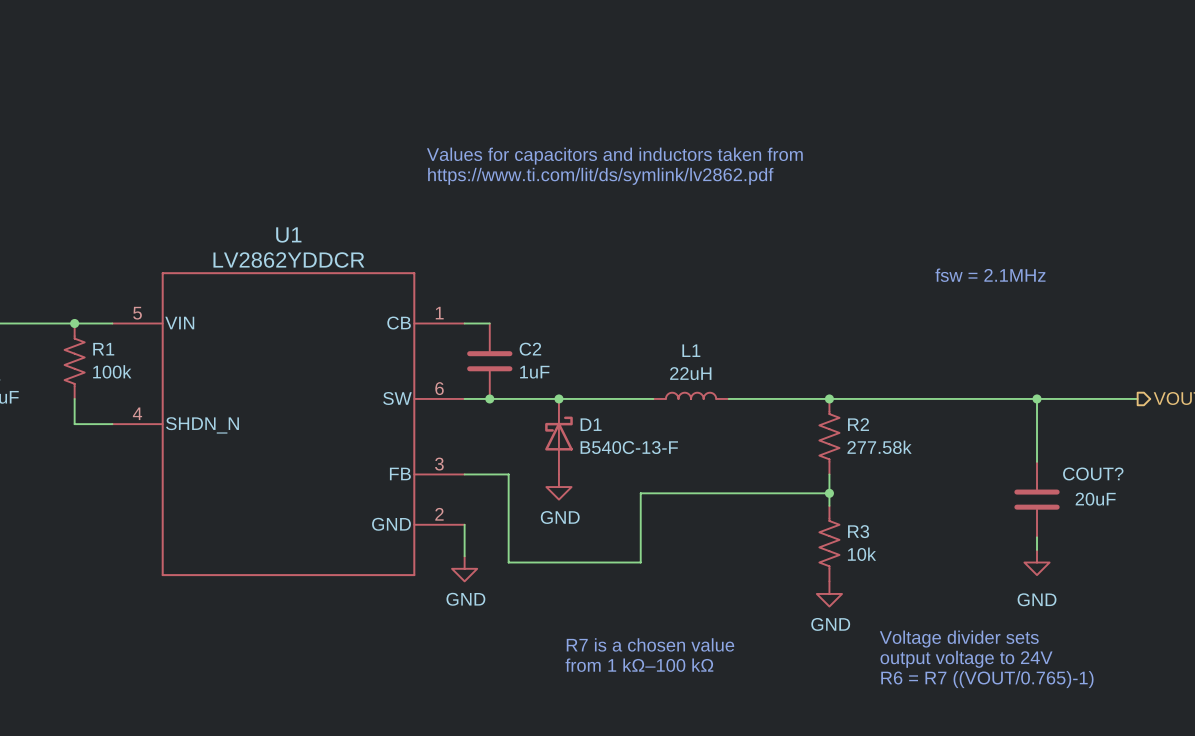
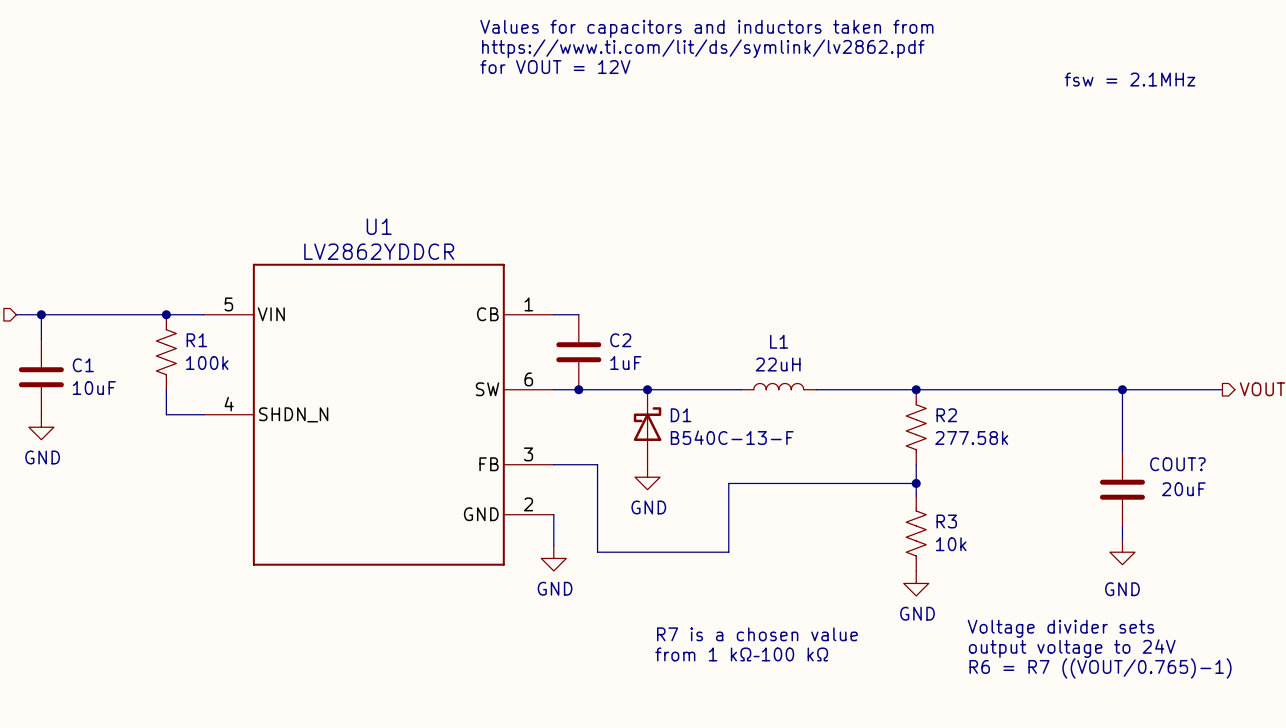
text: none -> for VOUT = 12V (555, 67)
text position: Values for capacitors and inductors taken from (614, 156) -> Values for capacitors and inductors taken from (706, 28)
text position: https://www.ti.com/lit/ds/symlink/lv2862.pdf (600, 176) -> https://www.ti.com/lit/ds/symlink/lv2862.pdf (703, 48)
text position: fsw = 2.1MHz (990, 275) -> fsw = 2.1MHz (1129, 79)

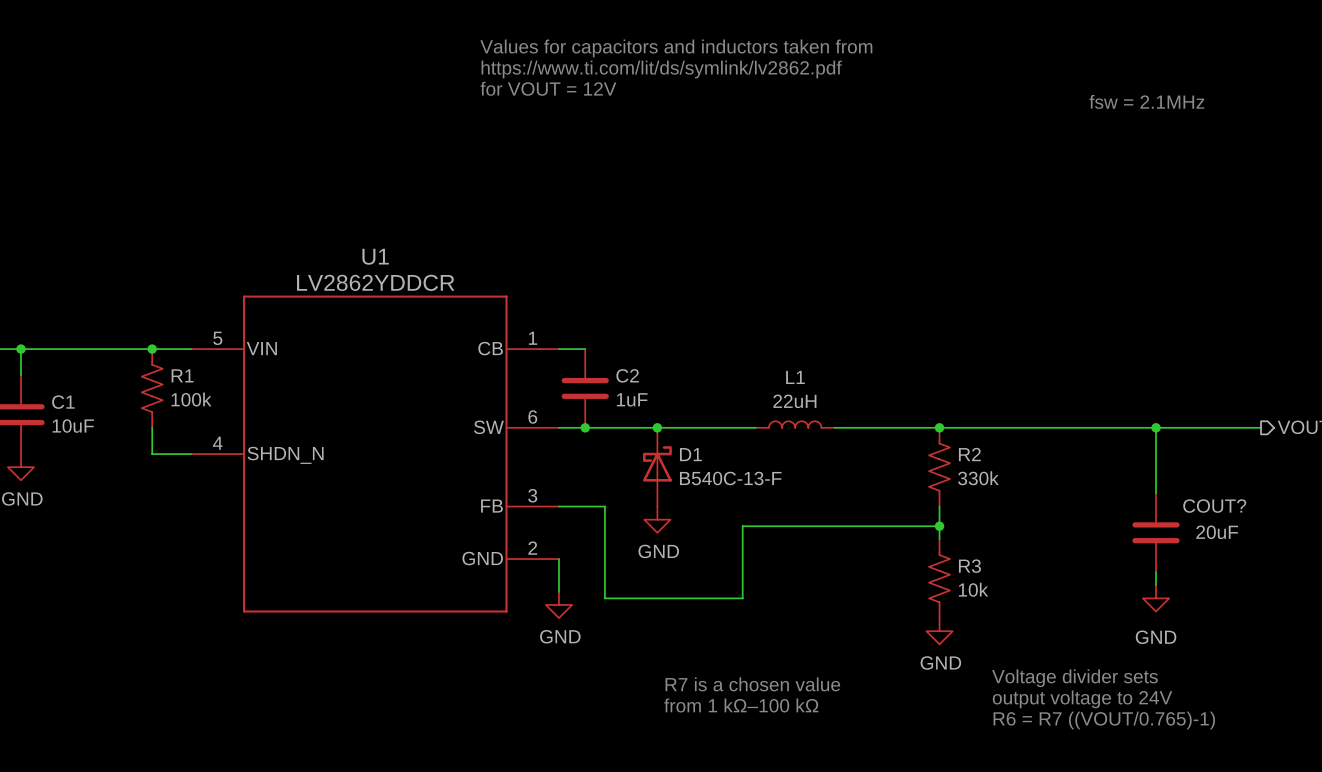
R2 value: 277.58k (971, 438) -> 330k (978, 478)

